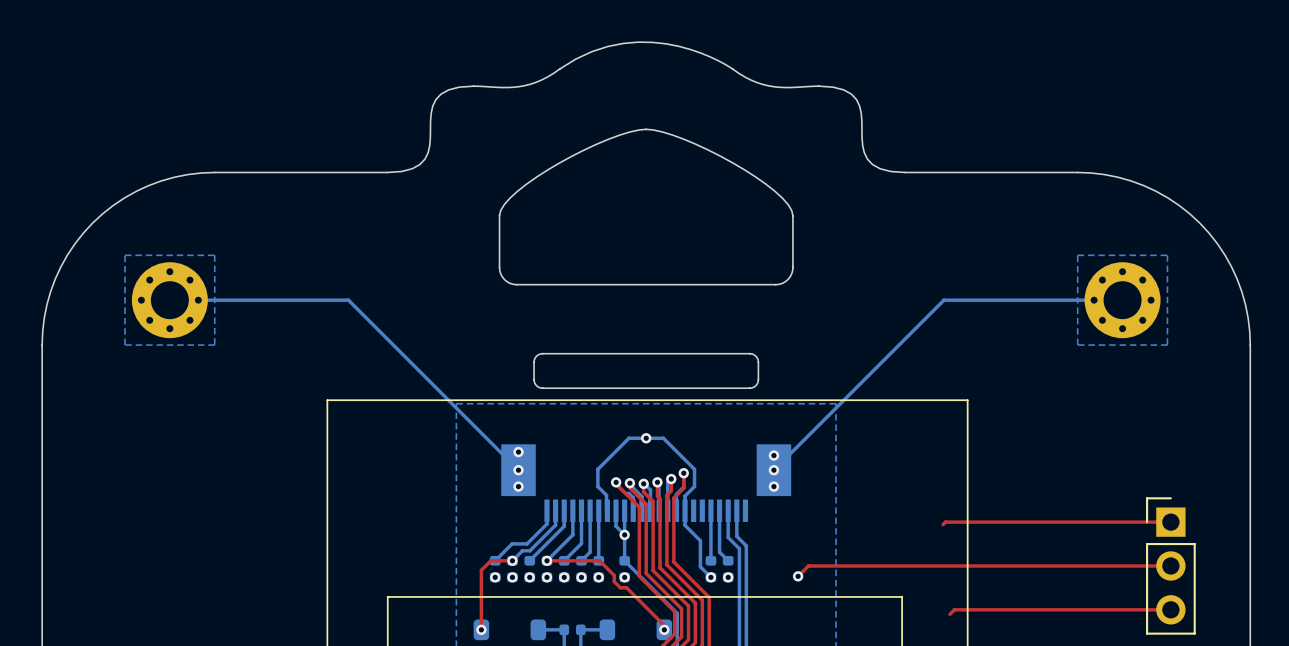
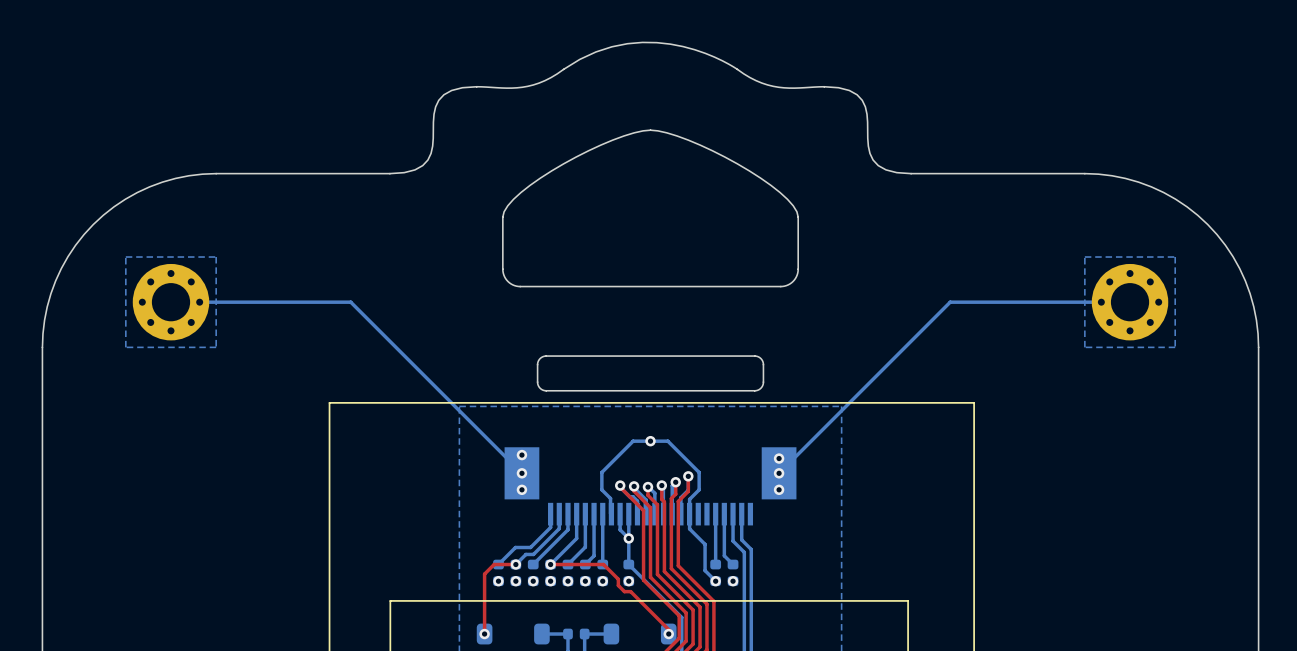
top track: (1170, 522) (945, 522) (943, 524) -> none
top track: (1170, 565) (808, 565) (798, 576) -> none
part: (1170, 565) -> none
via: (798, 576) -> none
top track: (1170, 609) (954, 609) (949, 614) -> none

